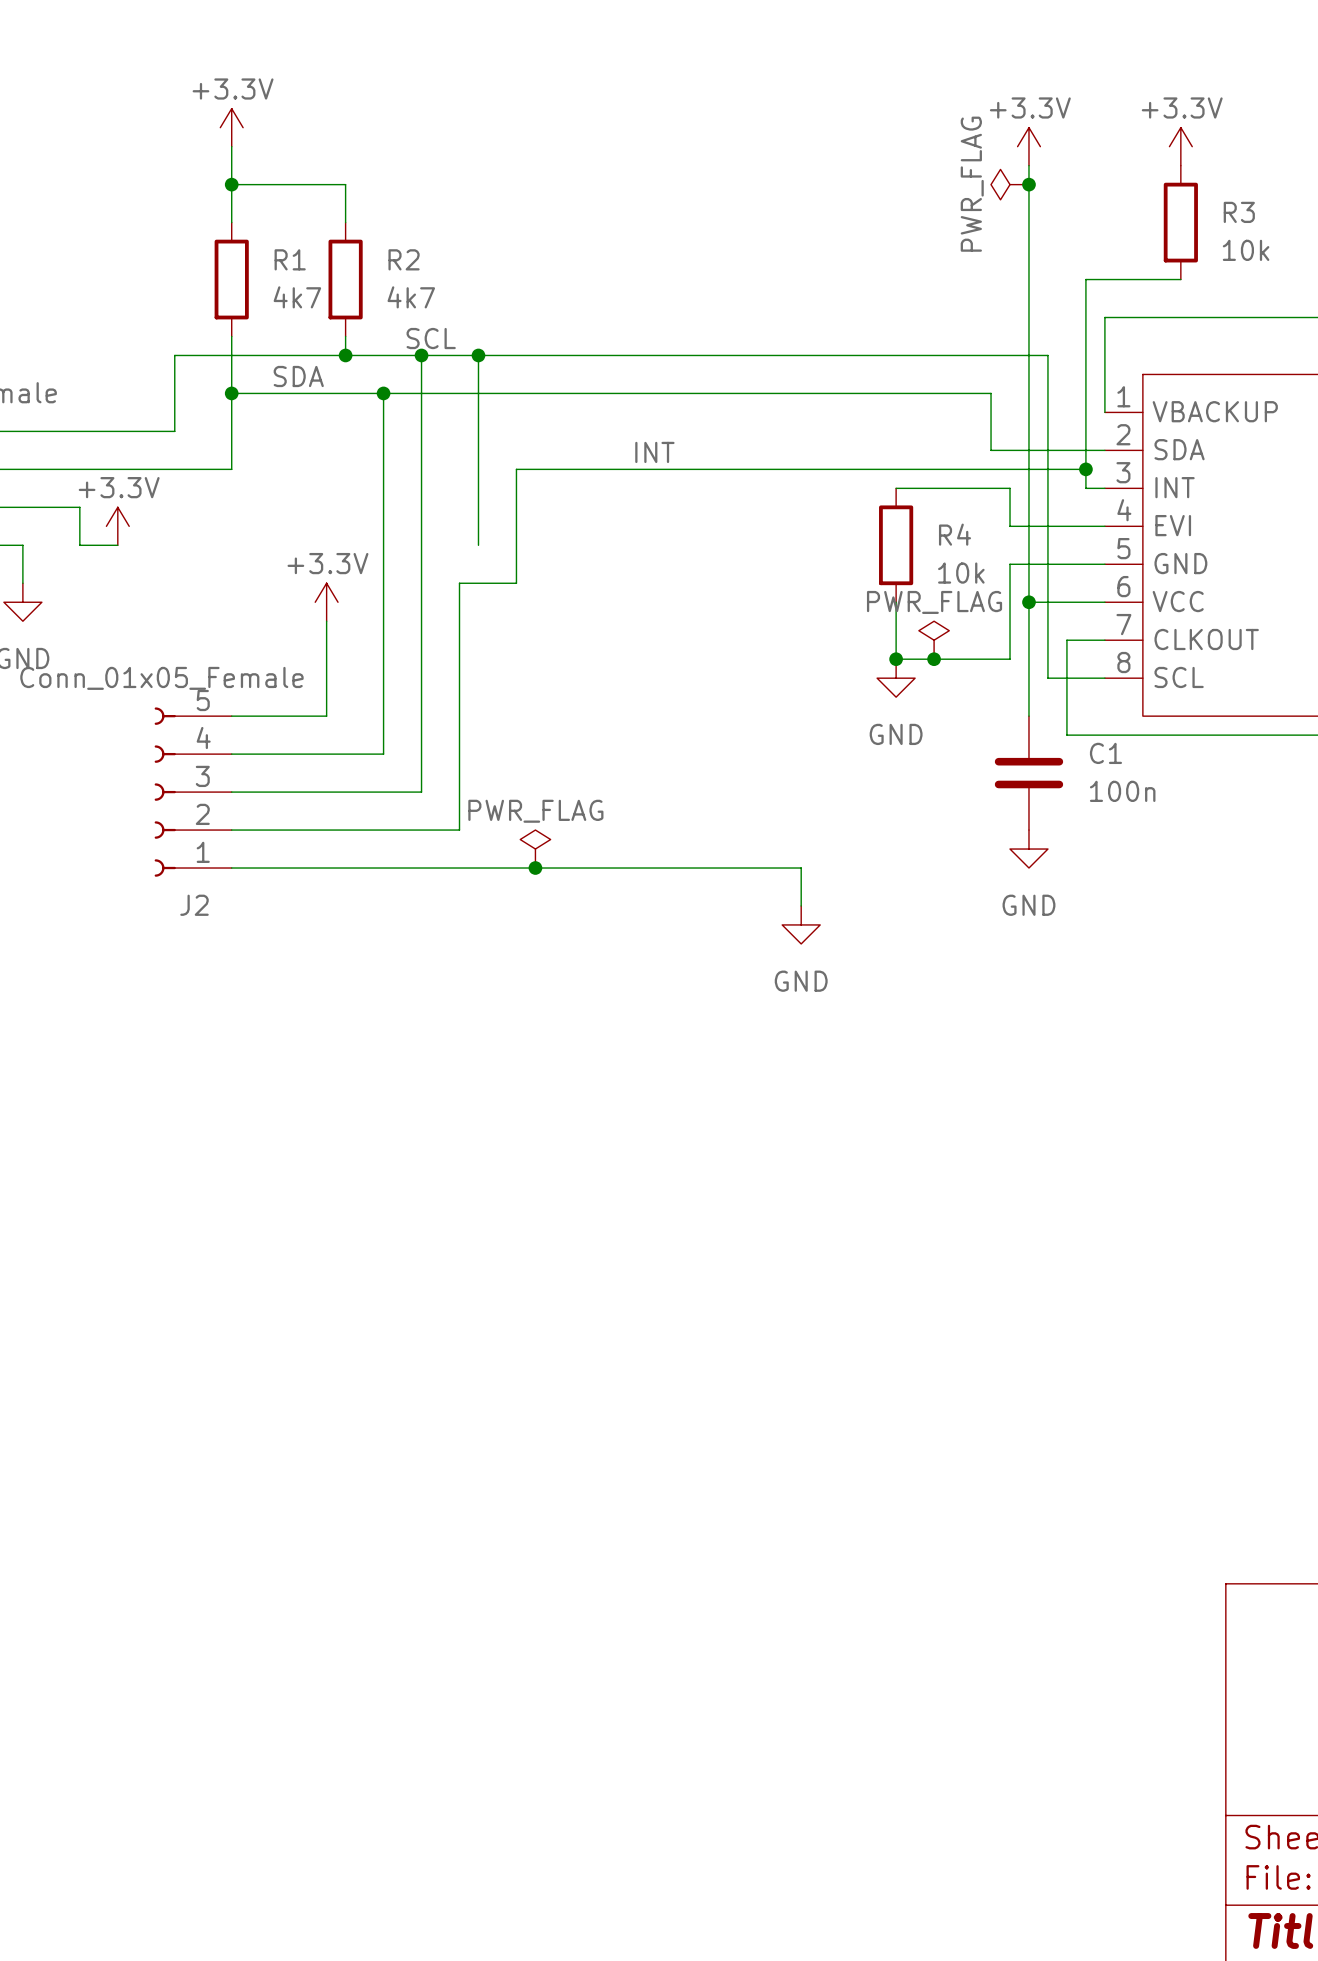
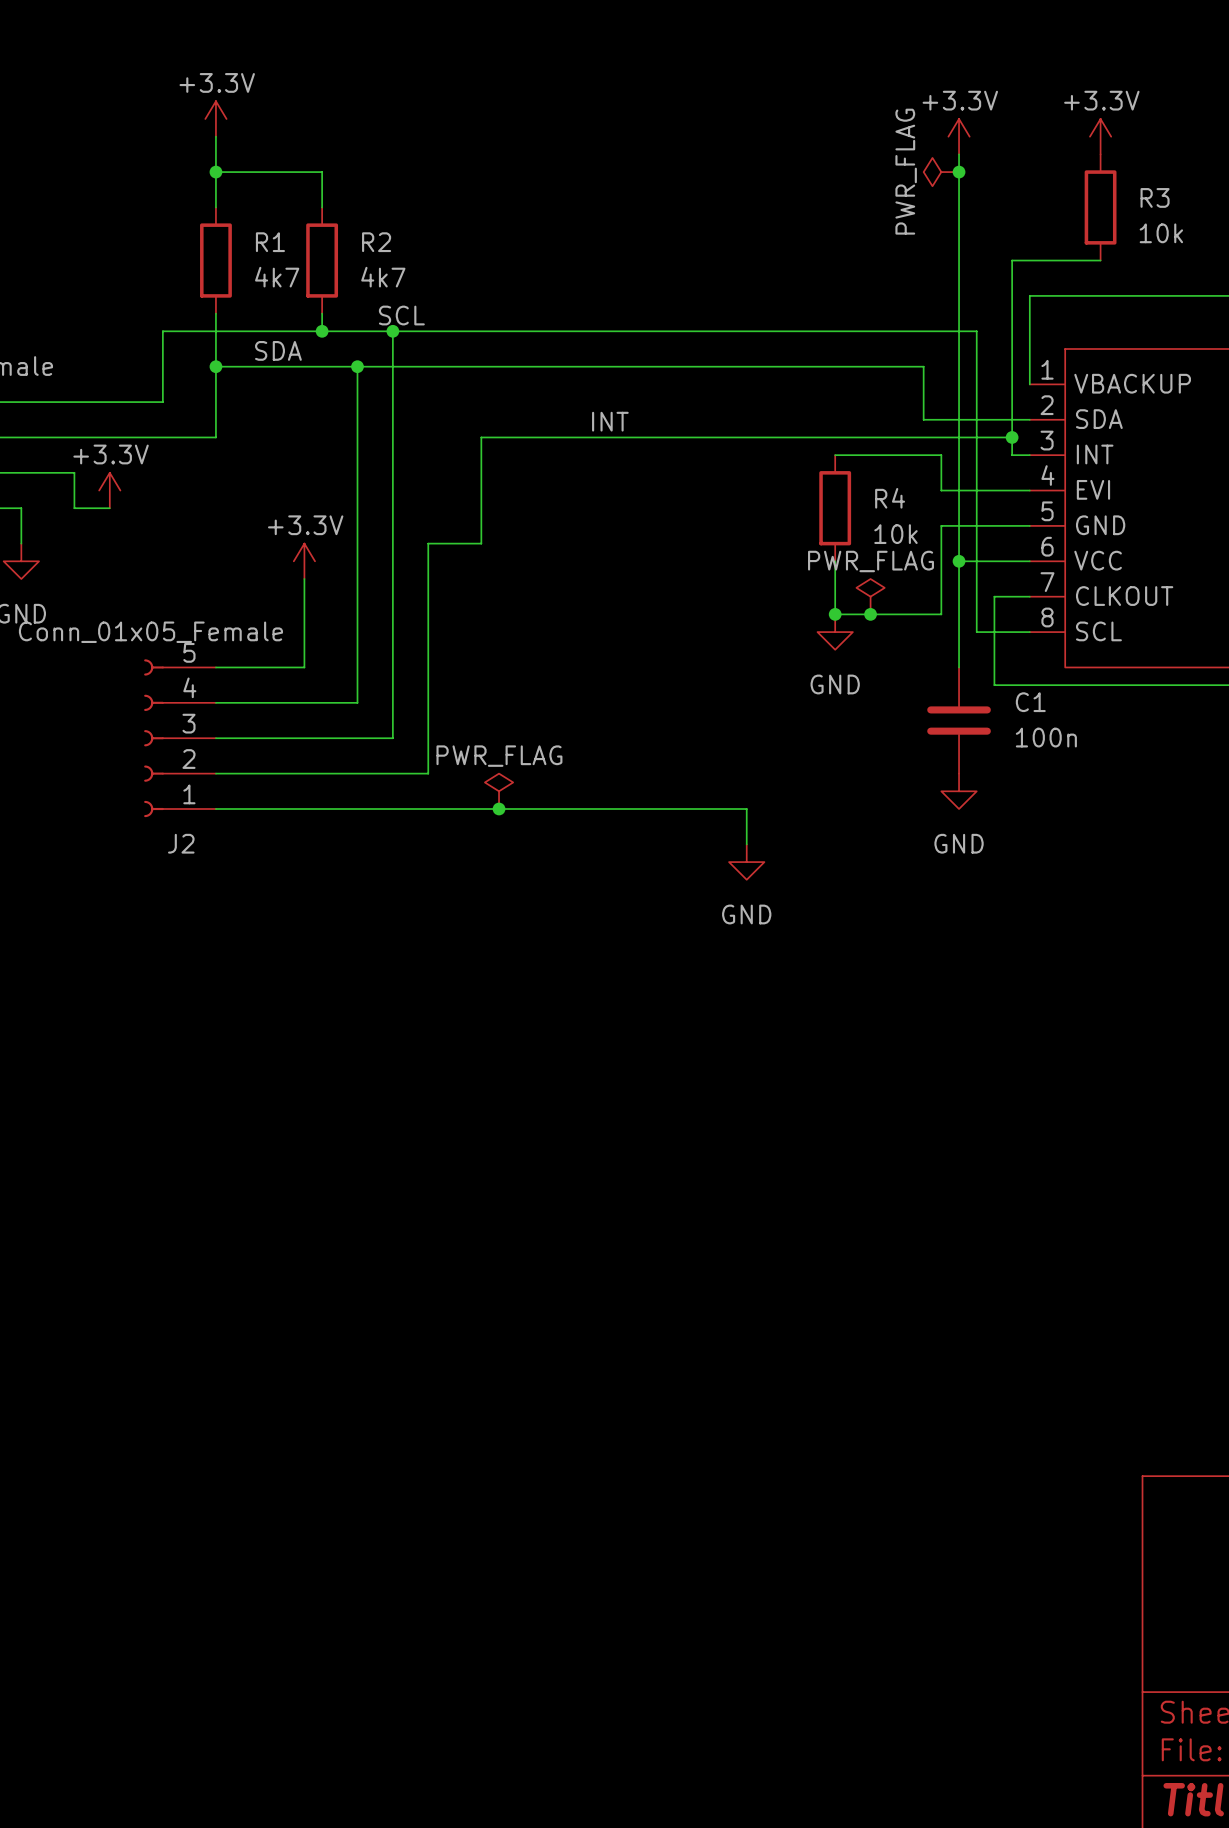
wire: (478, 355) (478, 545) -> none
junction: (478, 355) -> none

